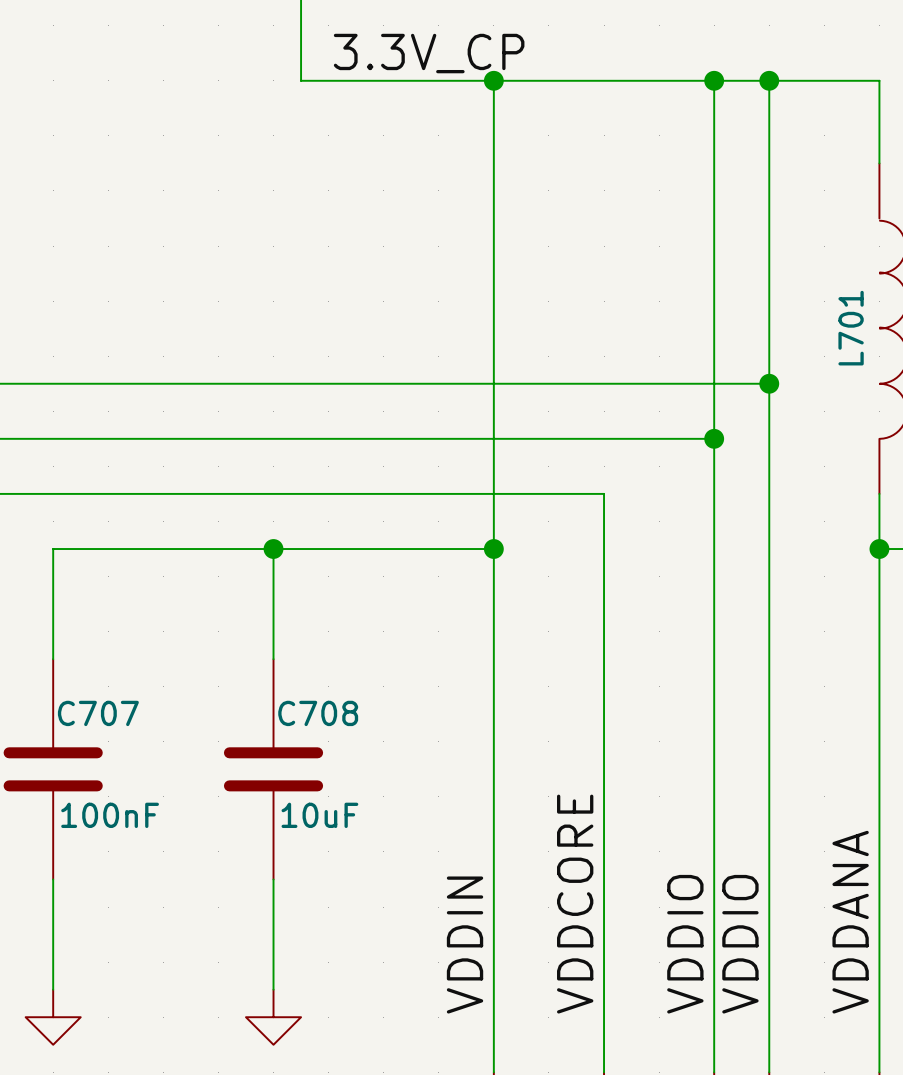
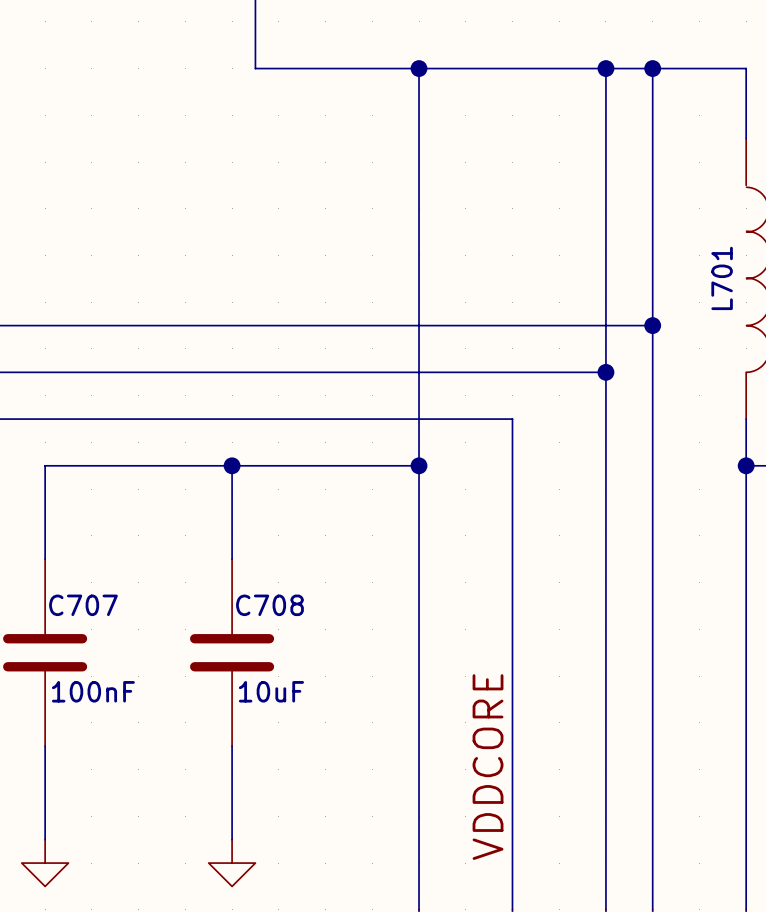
label: 3.3V_CP (429, 53) -> none
label: VDDANA (850, 922) -> none
label: VDDIO (685, 944) -> none
label: VDDIO (740, 944) -> none
label: VDDIN (465, 945) -> none

